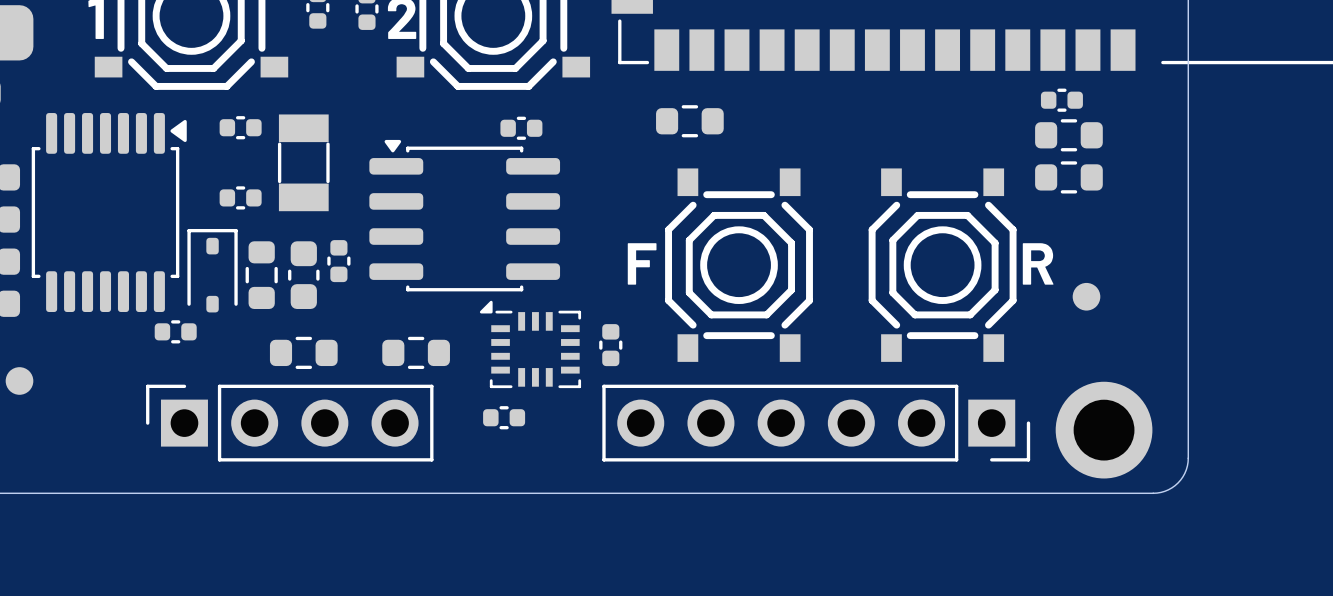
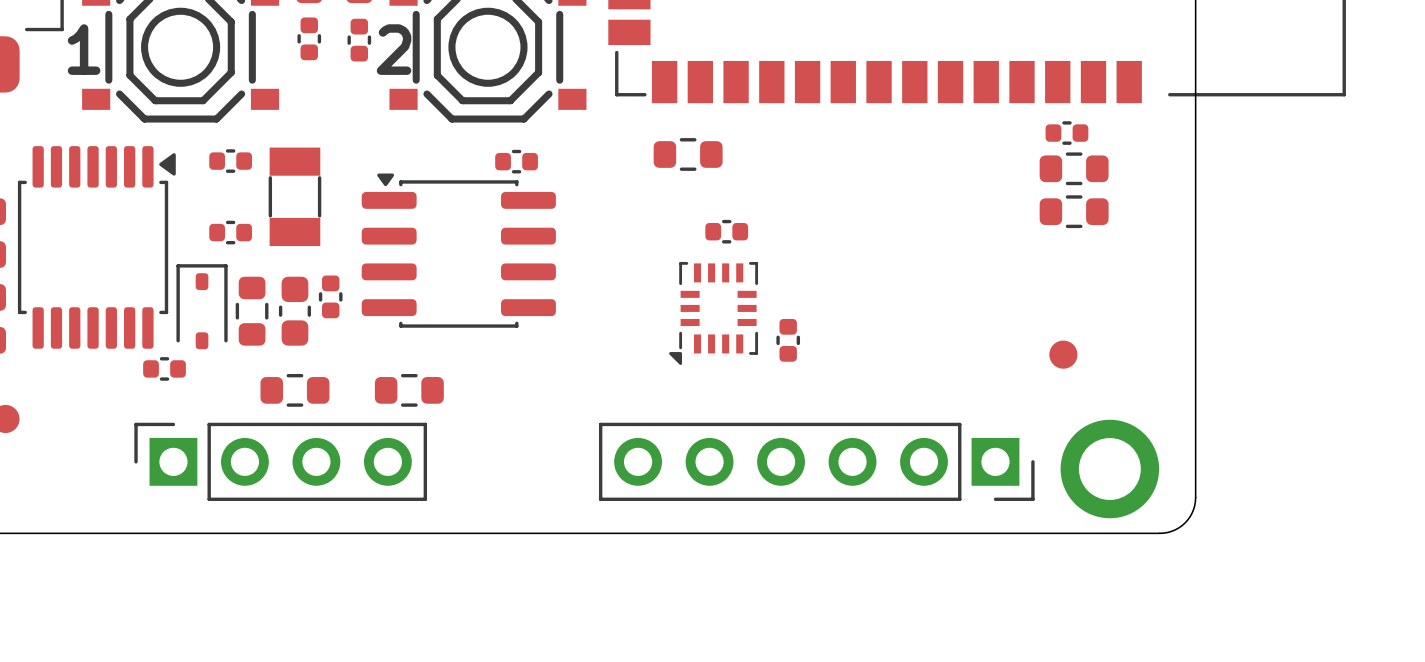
part footprint: [665, 168, 813, 362] -> [669, 261, 759, 365]
part: none -> (726, 231)
text: F (642, 263) -> none
text: R (1038, 263) -> none
part: (942, 265) -> none
part position: (1086, 296) -> (1063, 354)
part: none -> (788, 340)
part: (530, 344) -> none
part: (610, 345) -> none
part: (504, 417) -> none

